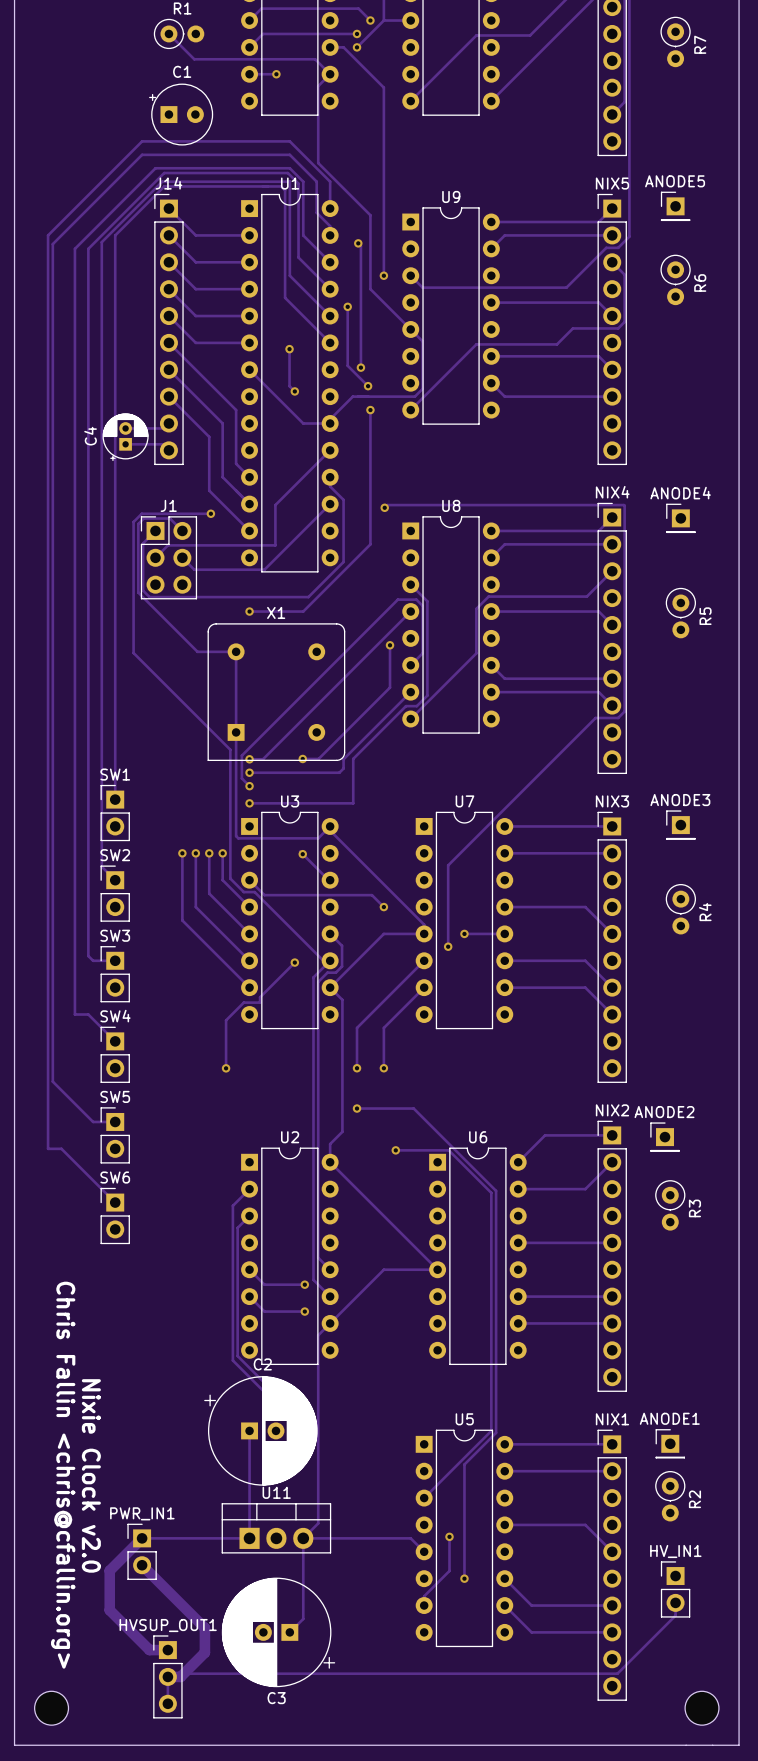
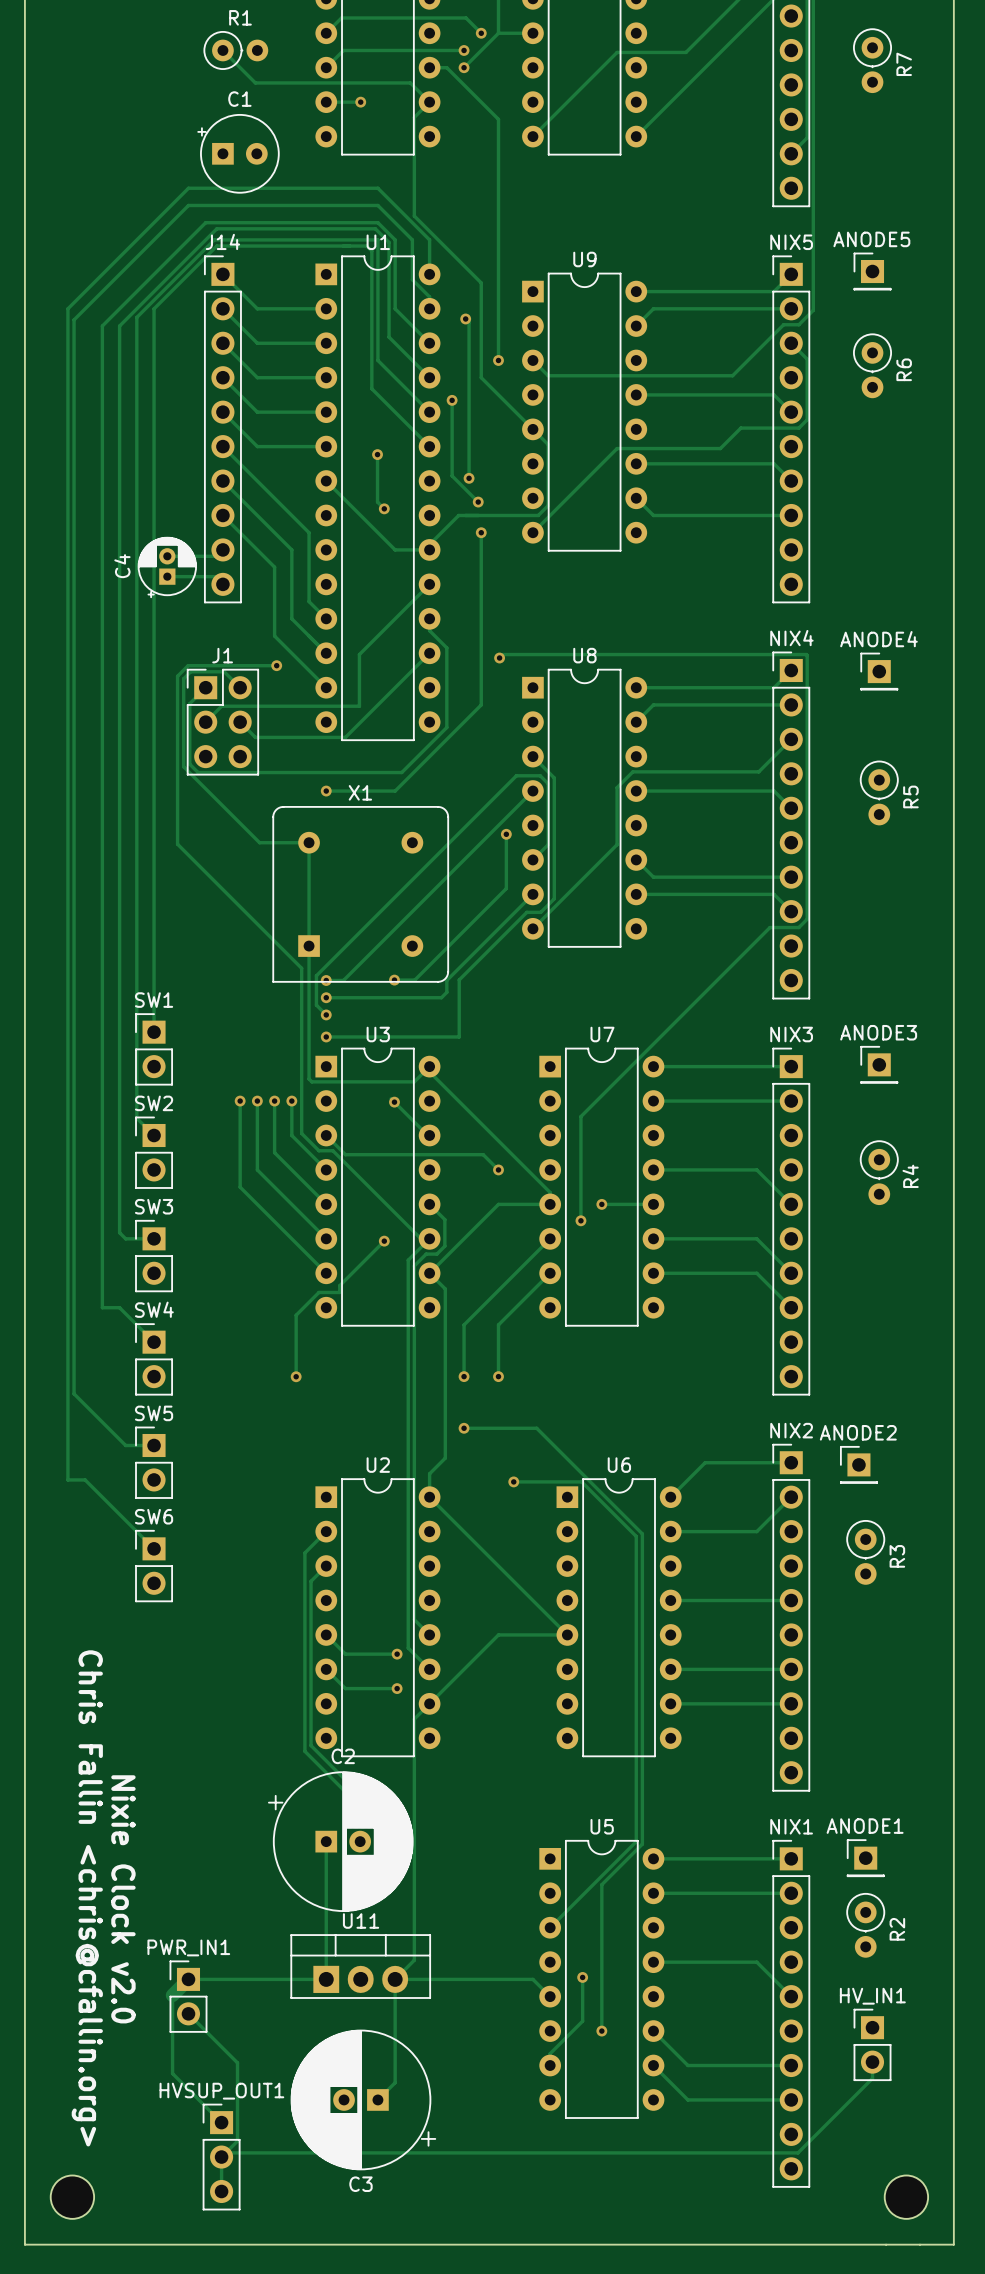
track: (129, 1550) (109, 1570) (109, 1610) (149, 1650) (167, 1650) -> (172, 1995) (172, 2073) (221, 2122)
track width: thick (142, 1565) (180, 1603) -> thin (188, 2013) (237, 2062)
track: (180, 1603) (204, 1628) (204, 1652) (180, 1676) (167, 1676) -> (237, 2062) (237, 2141) (225, 2152)

